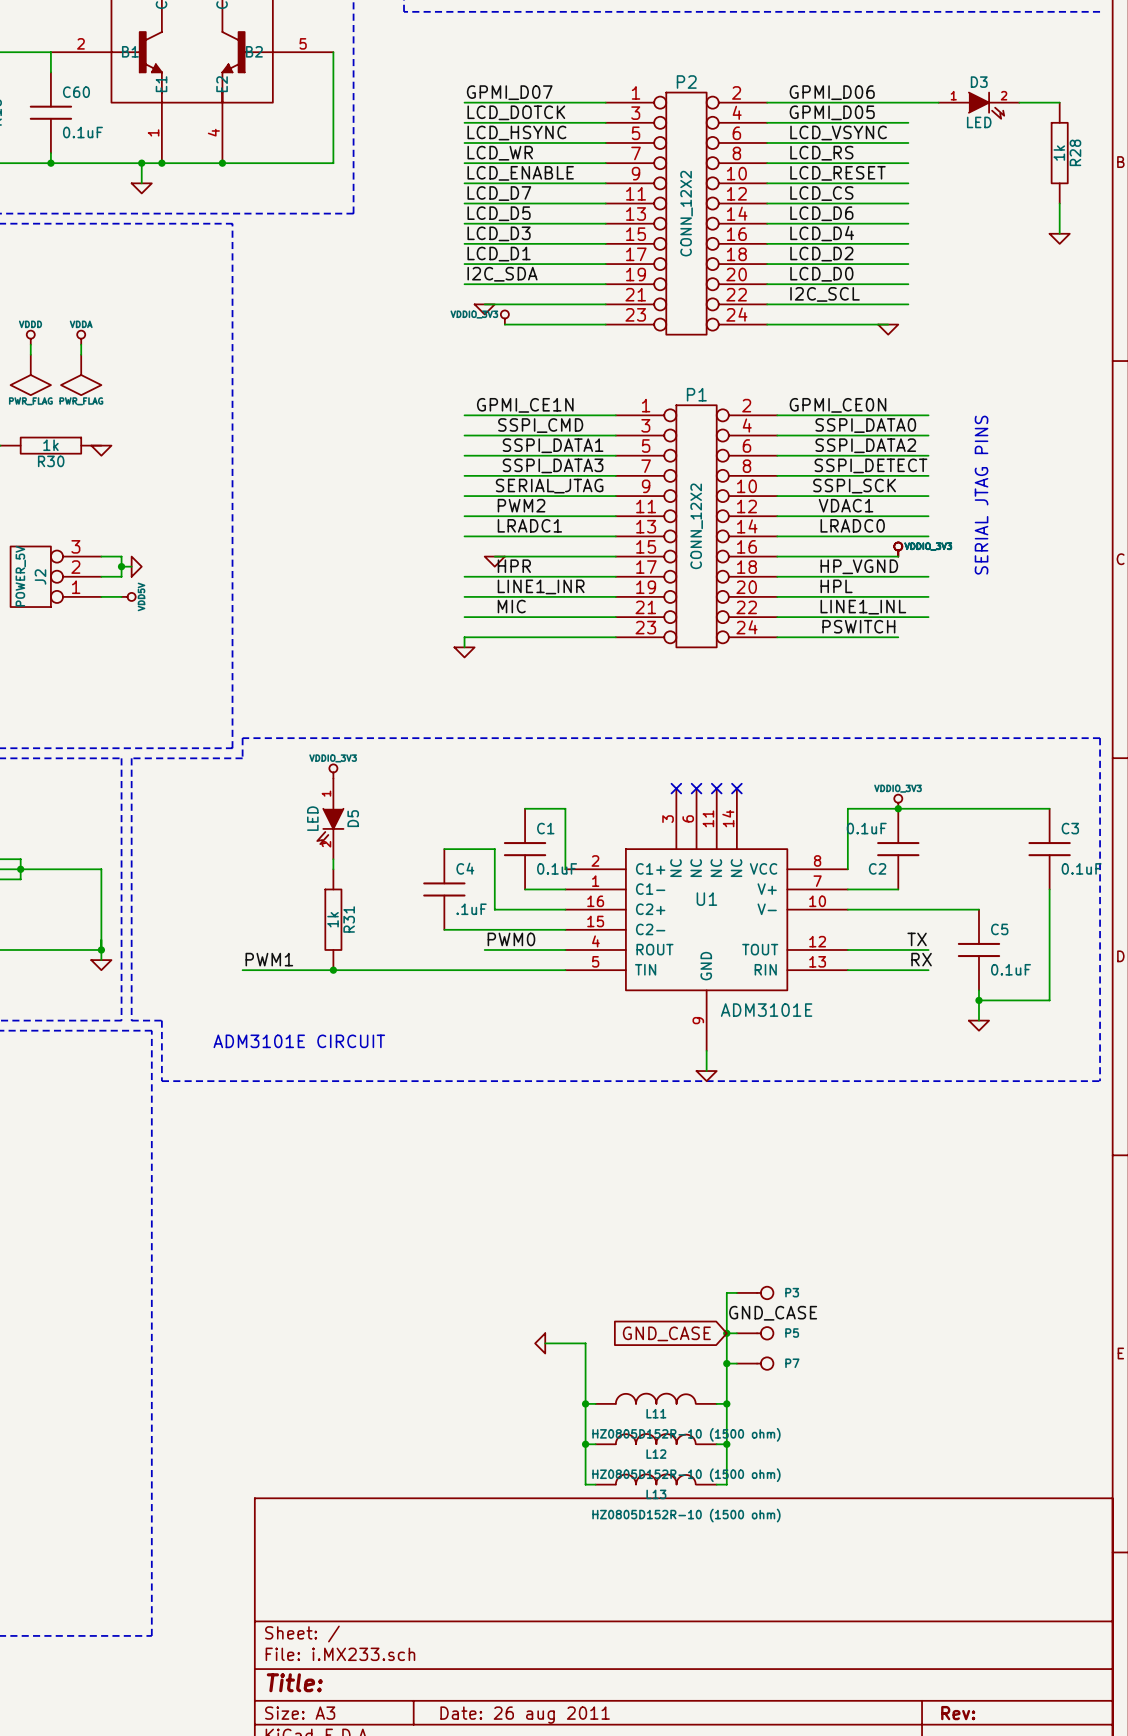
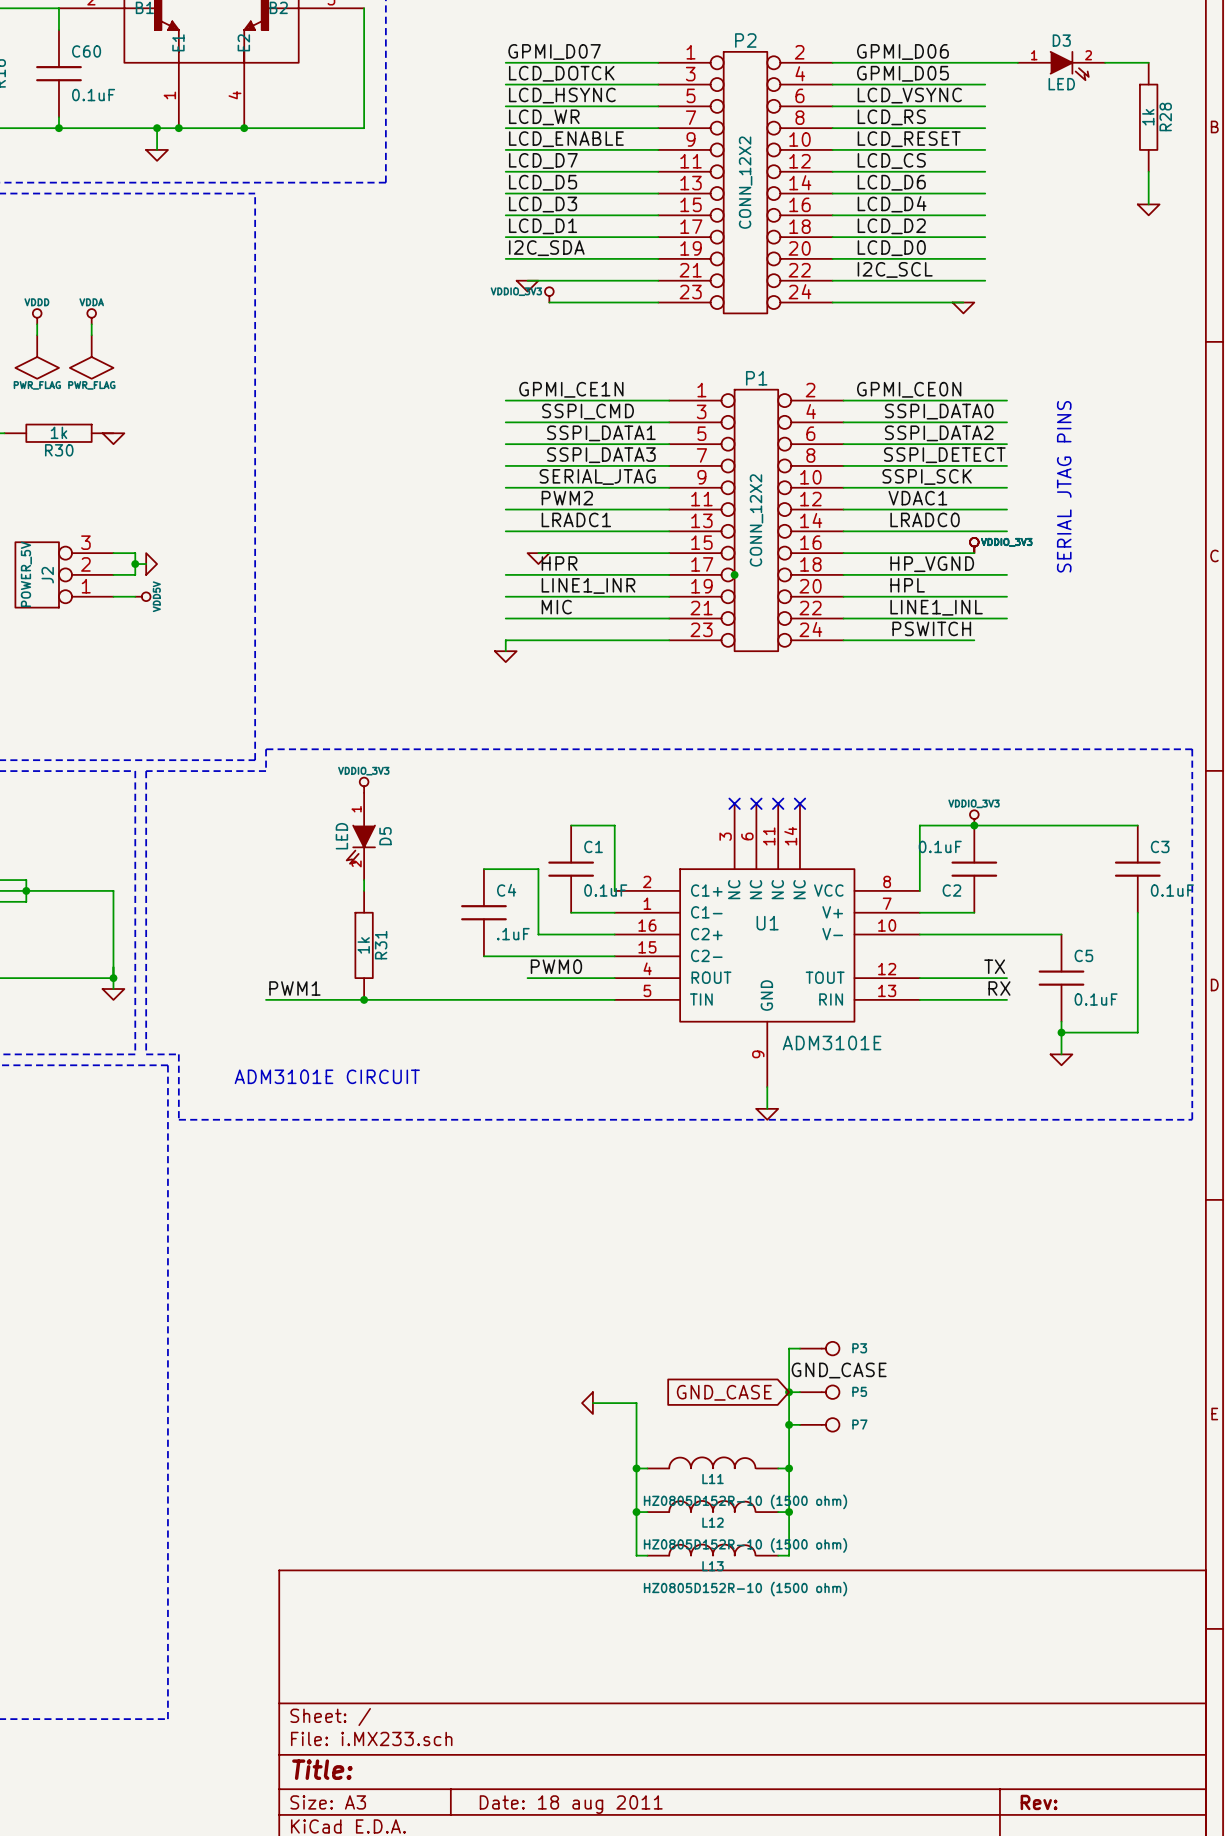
junction: none -> (734, 574)
title block: Date: 26 aug 2011 (525, 1715) -> Date: 18 aug 2011 (571, 1804)

